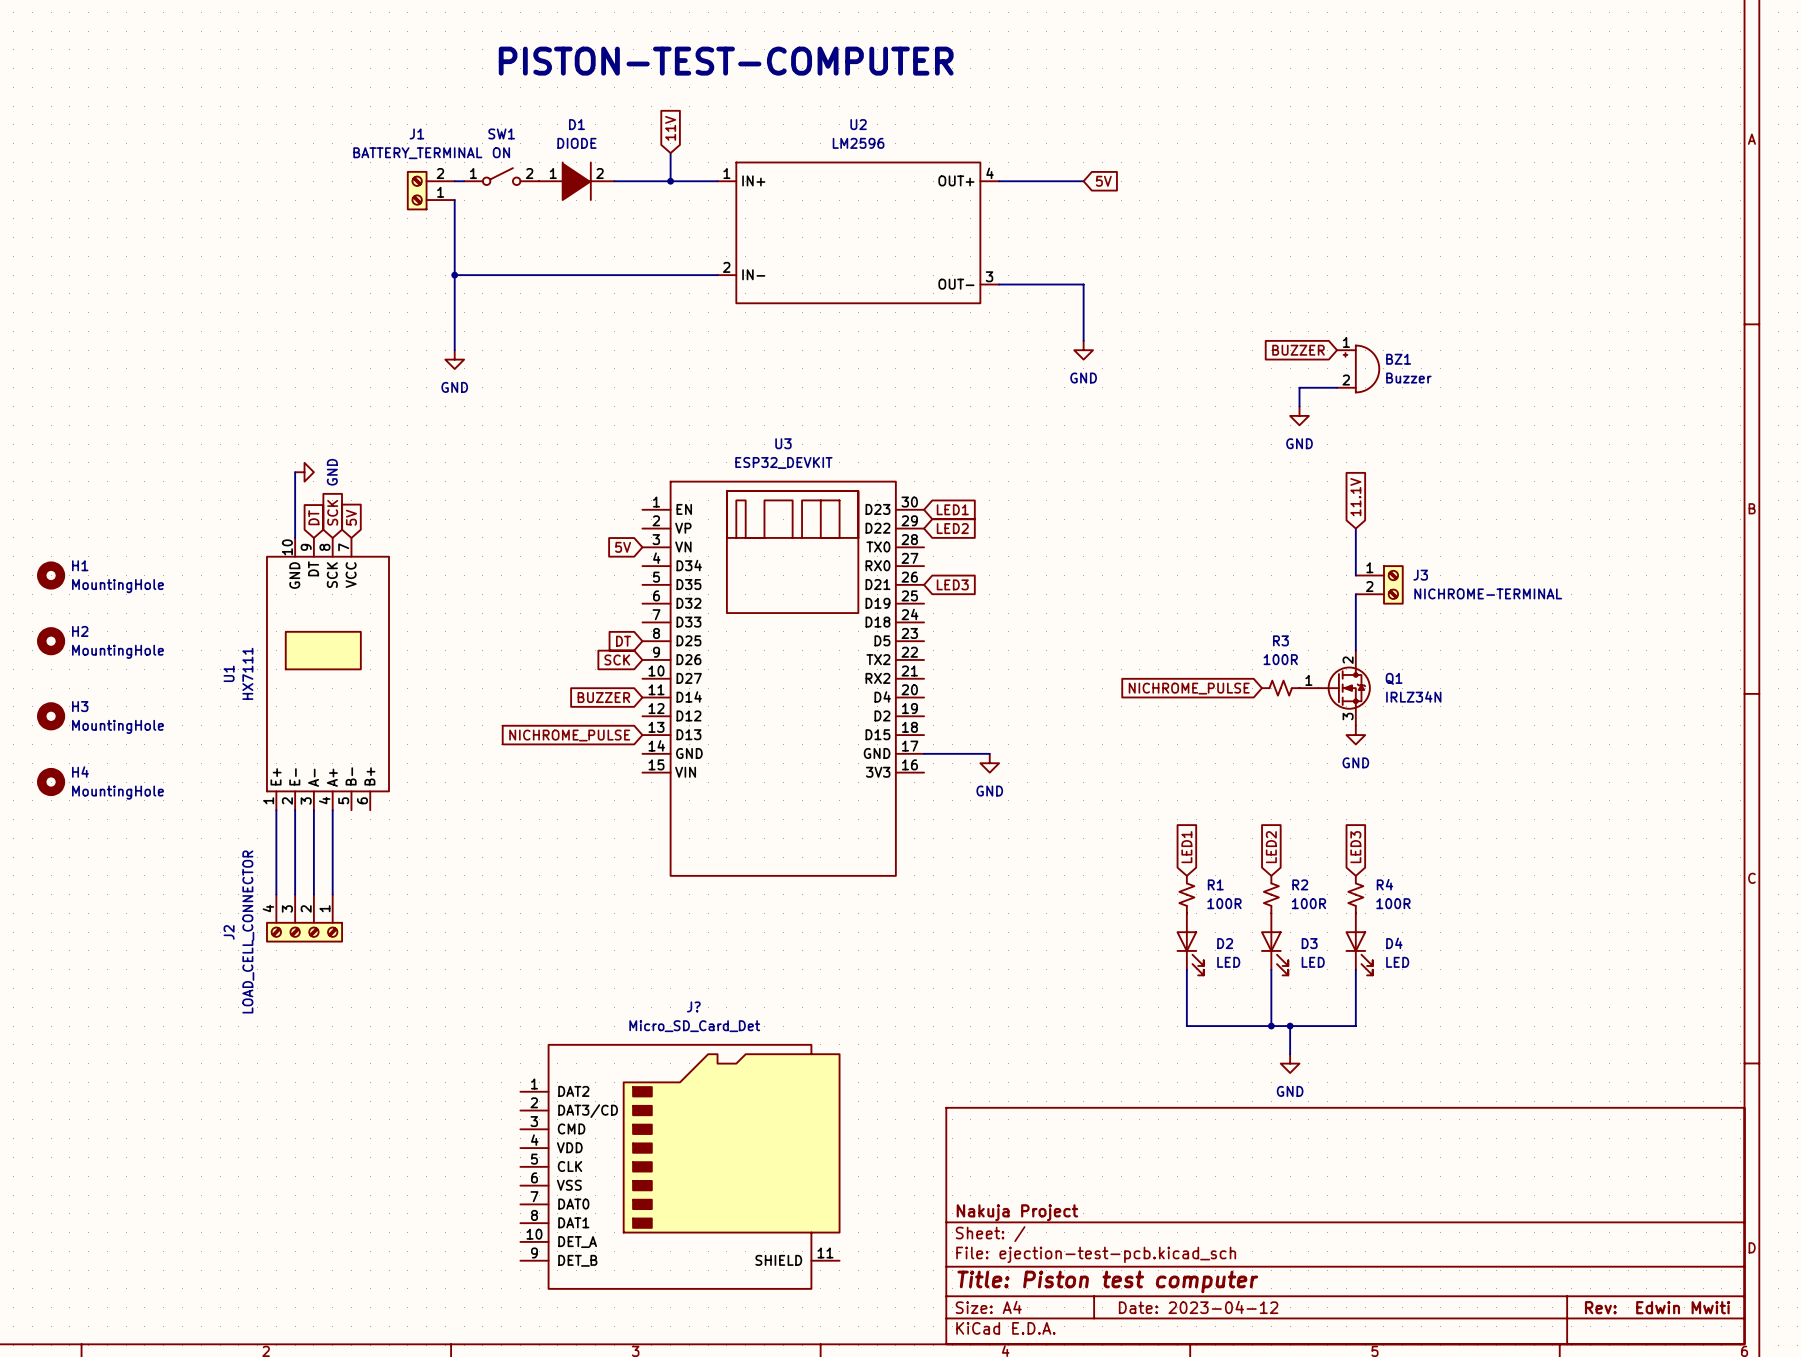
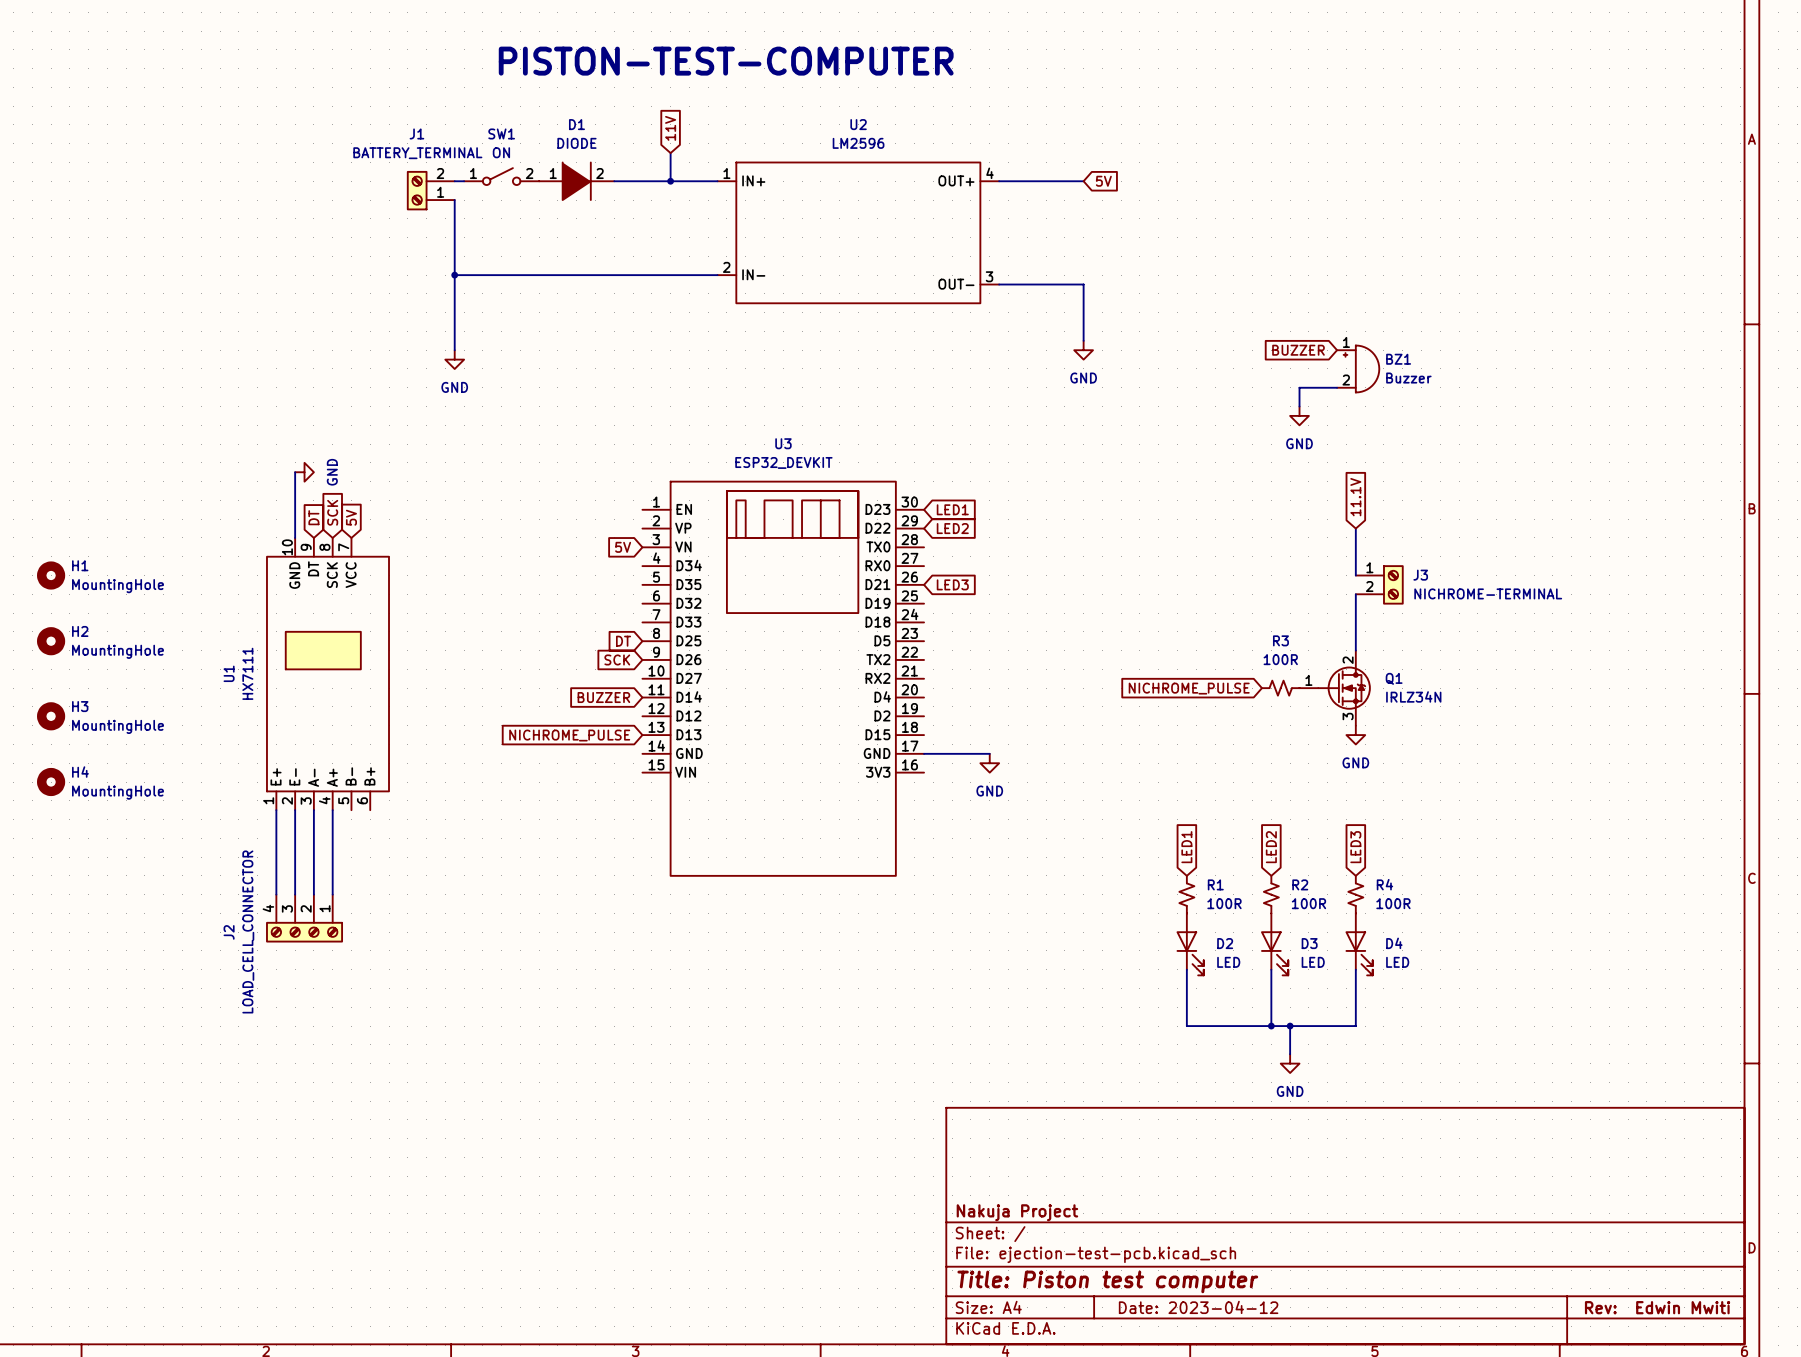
J?: Micro_SD_Card_Det (680, 1166) -> none

